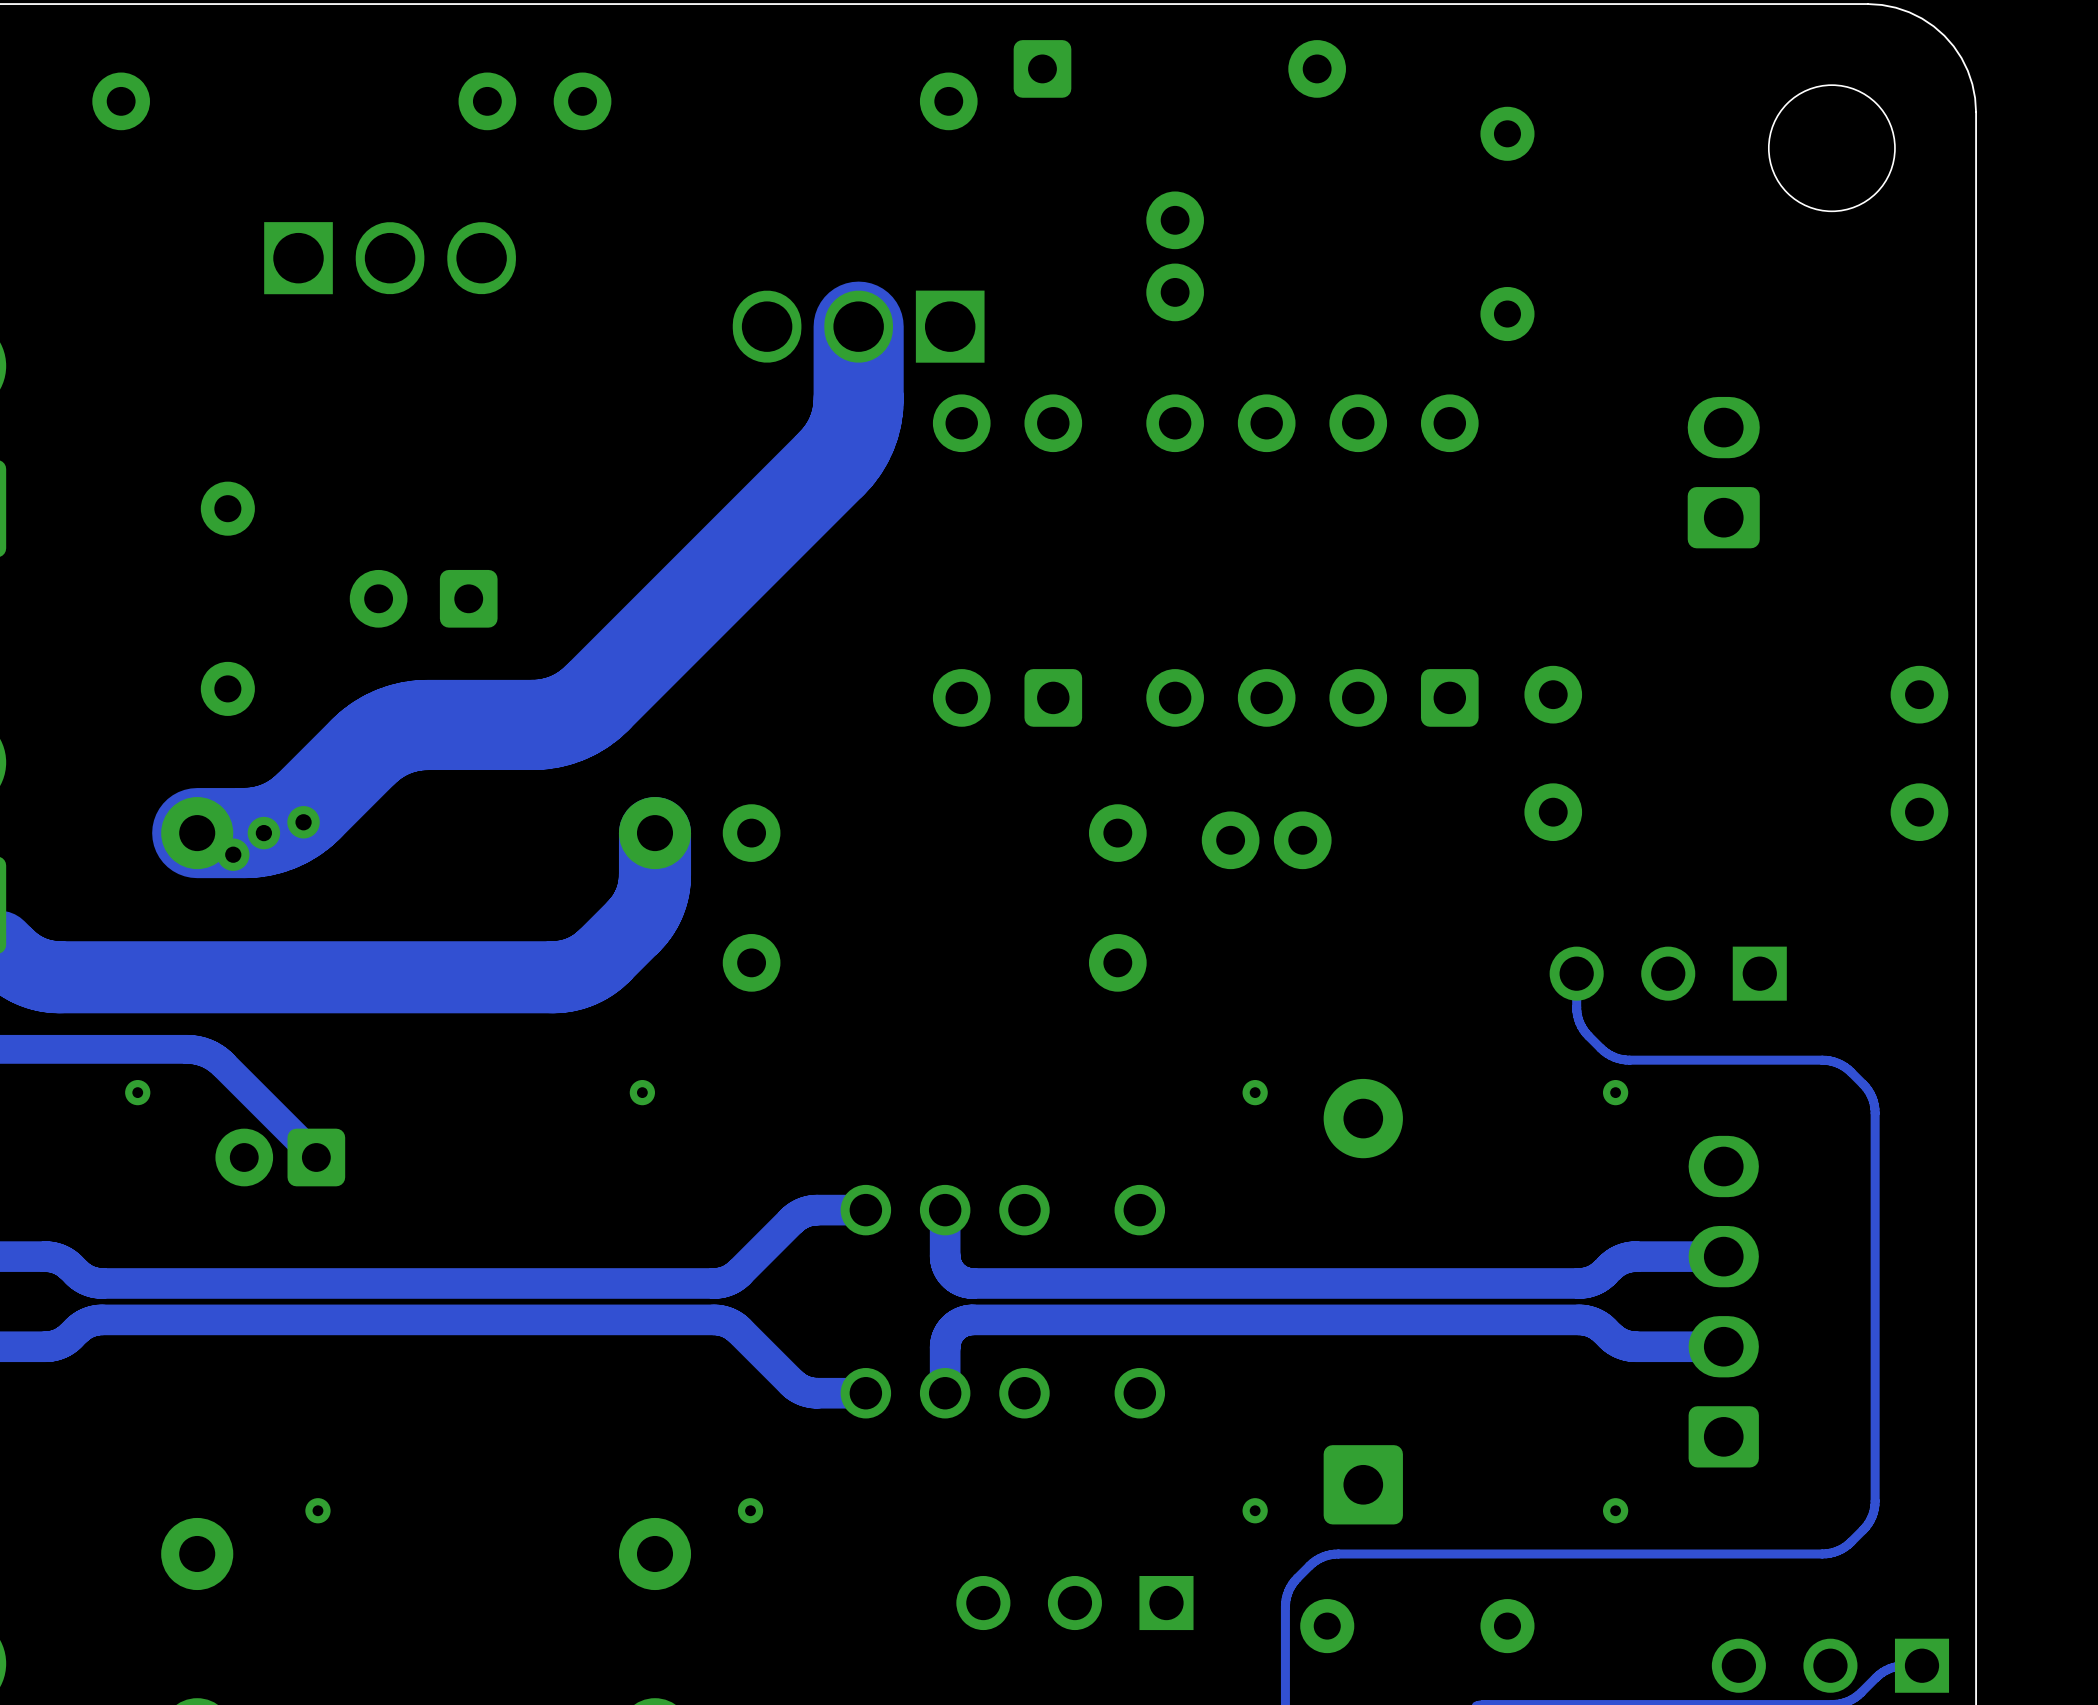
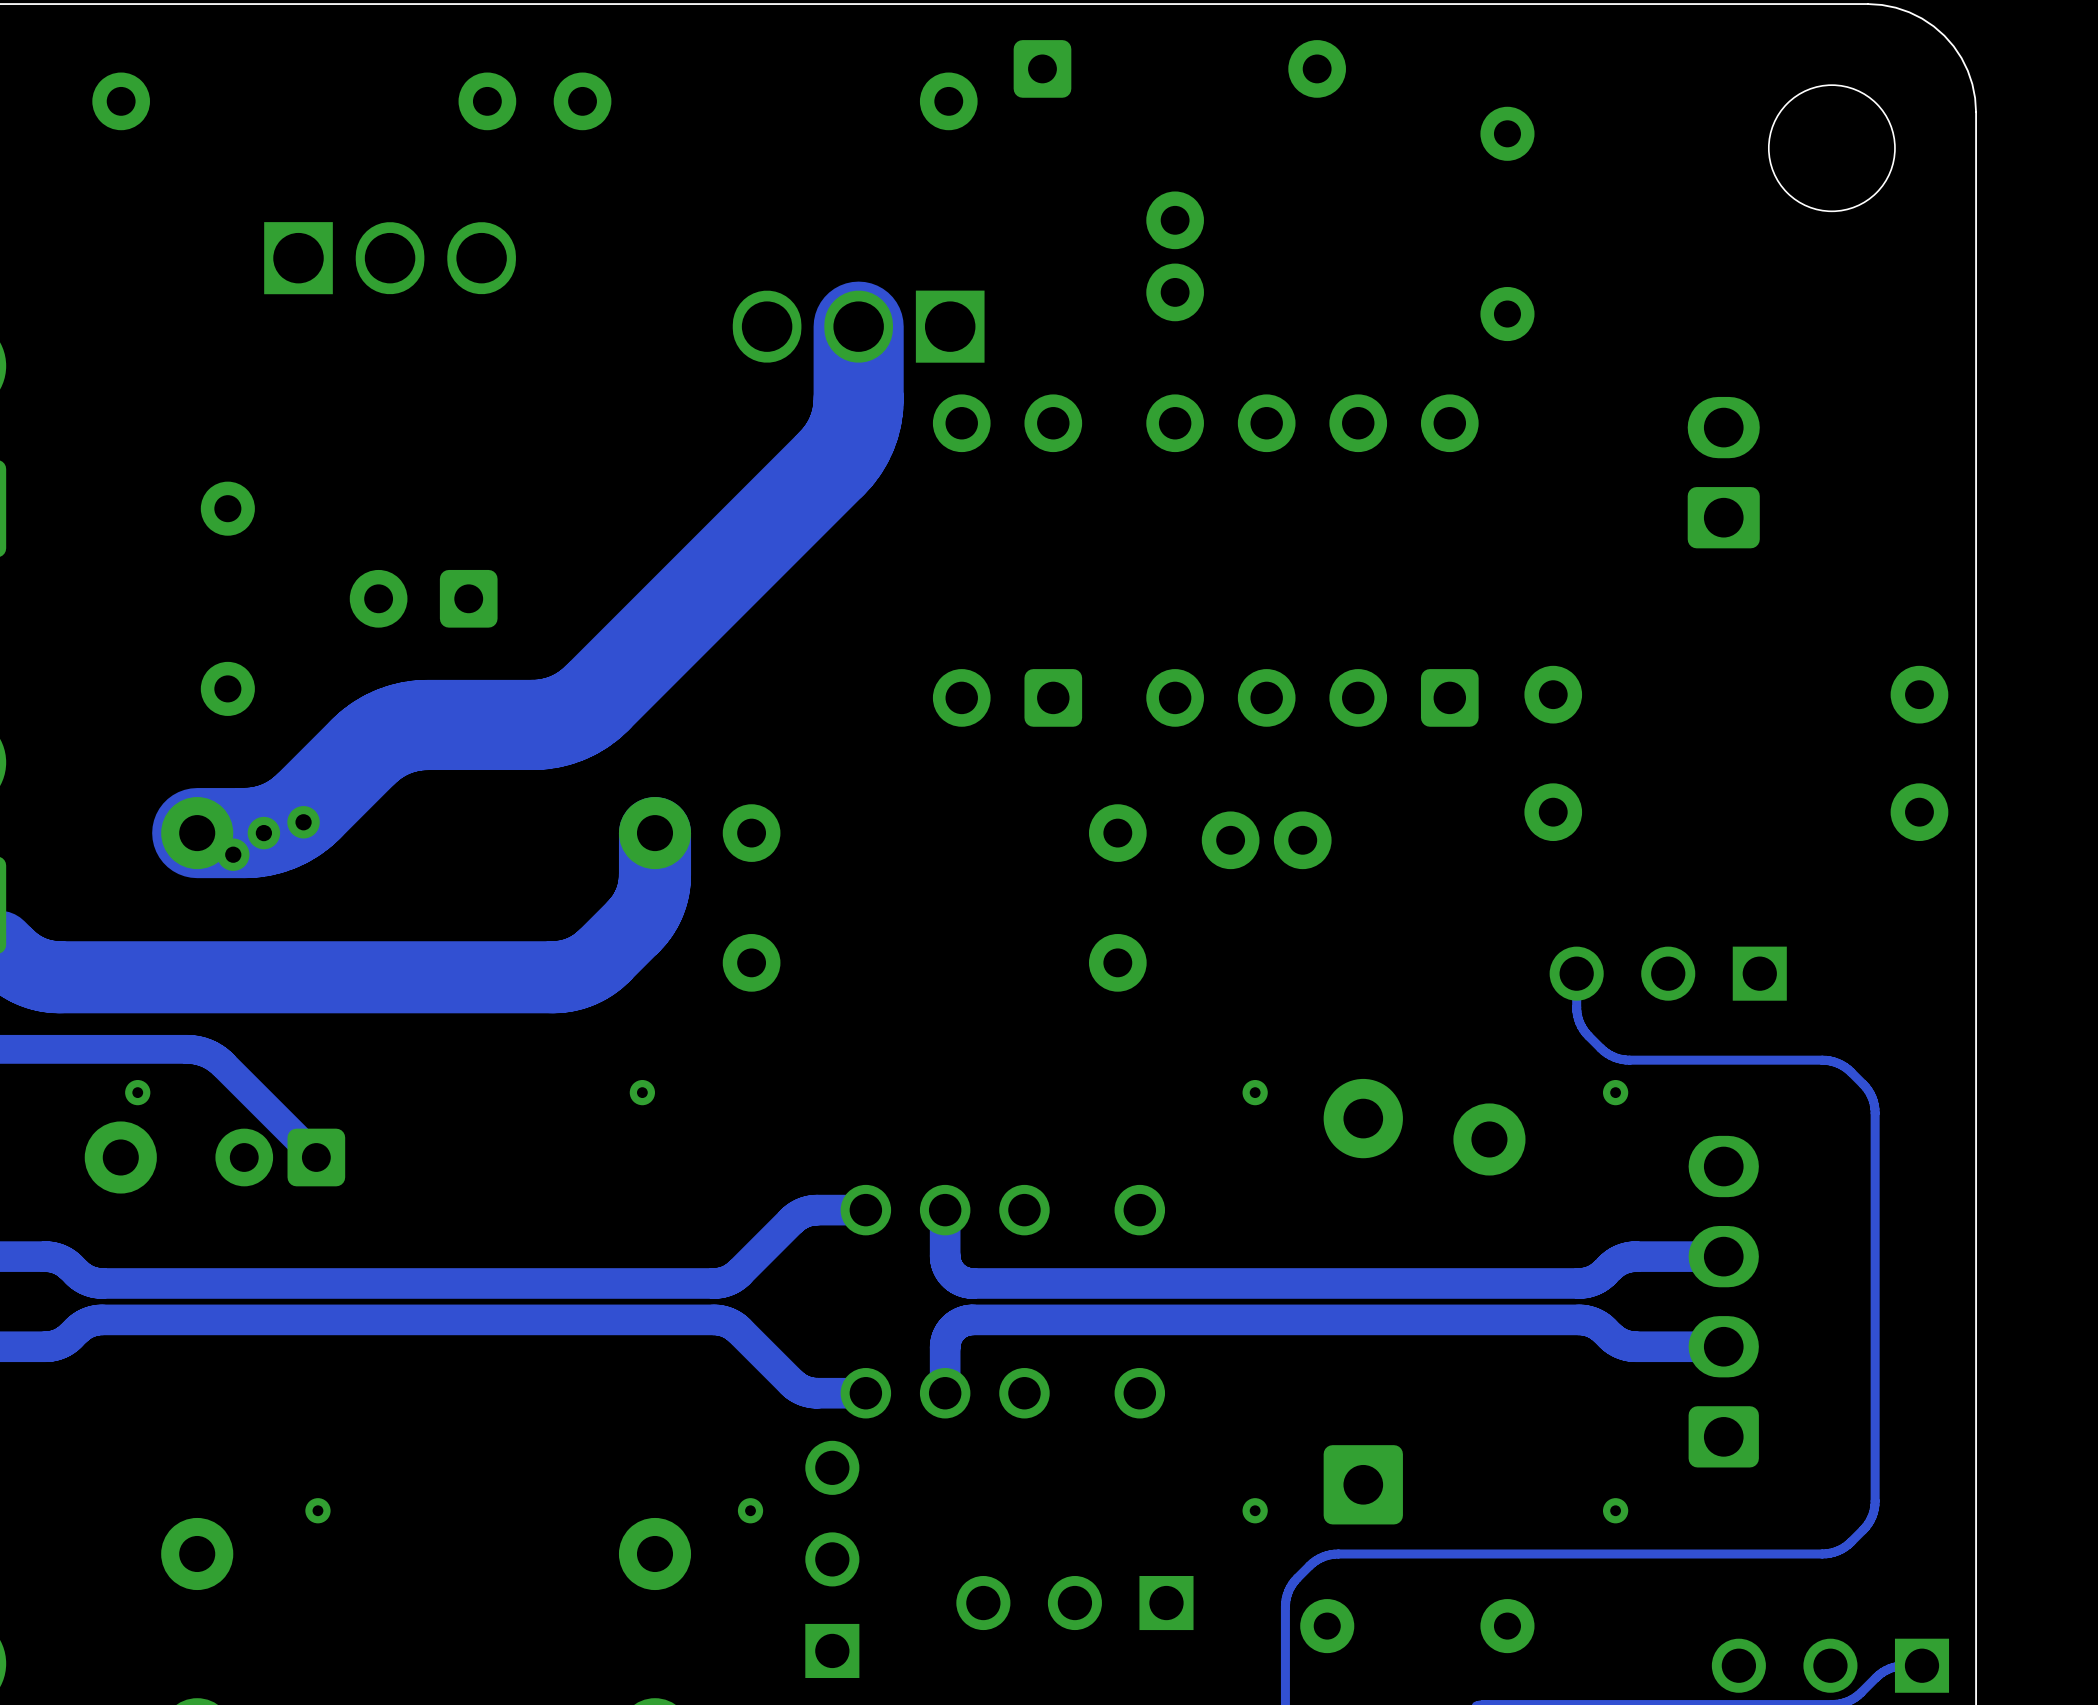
part: none -> (1489, 1139)
part: none -> (120, 1157)
part: none -> (832, 1559)

